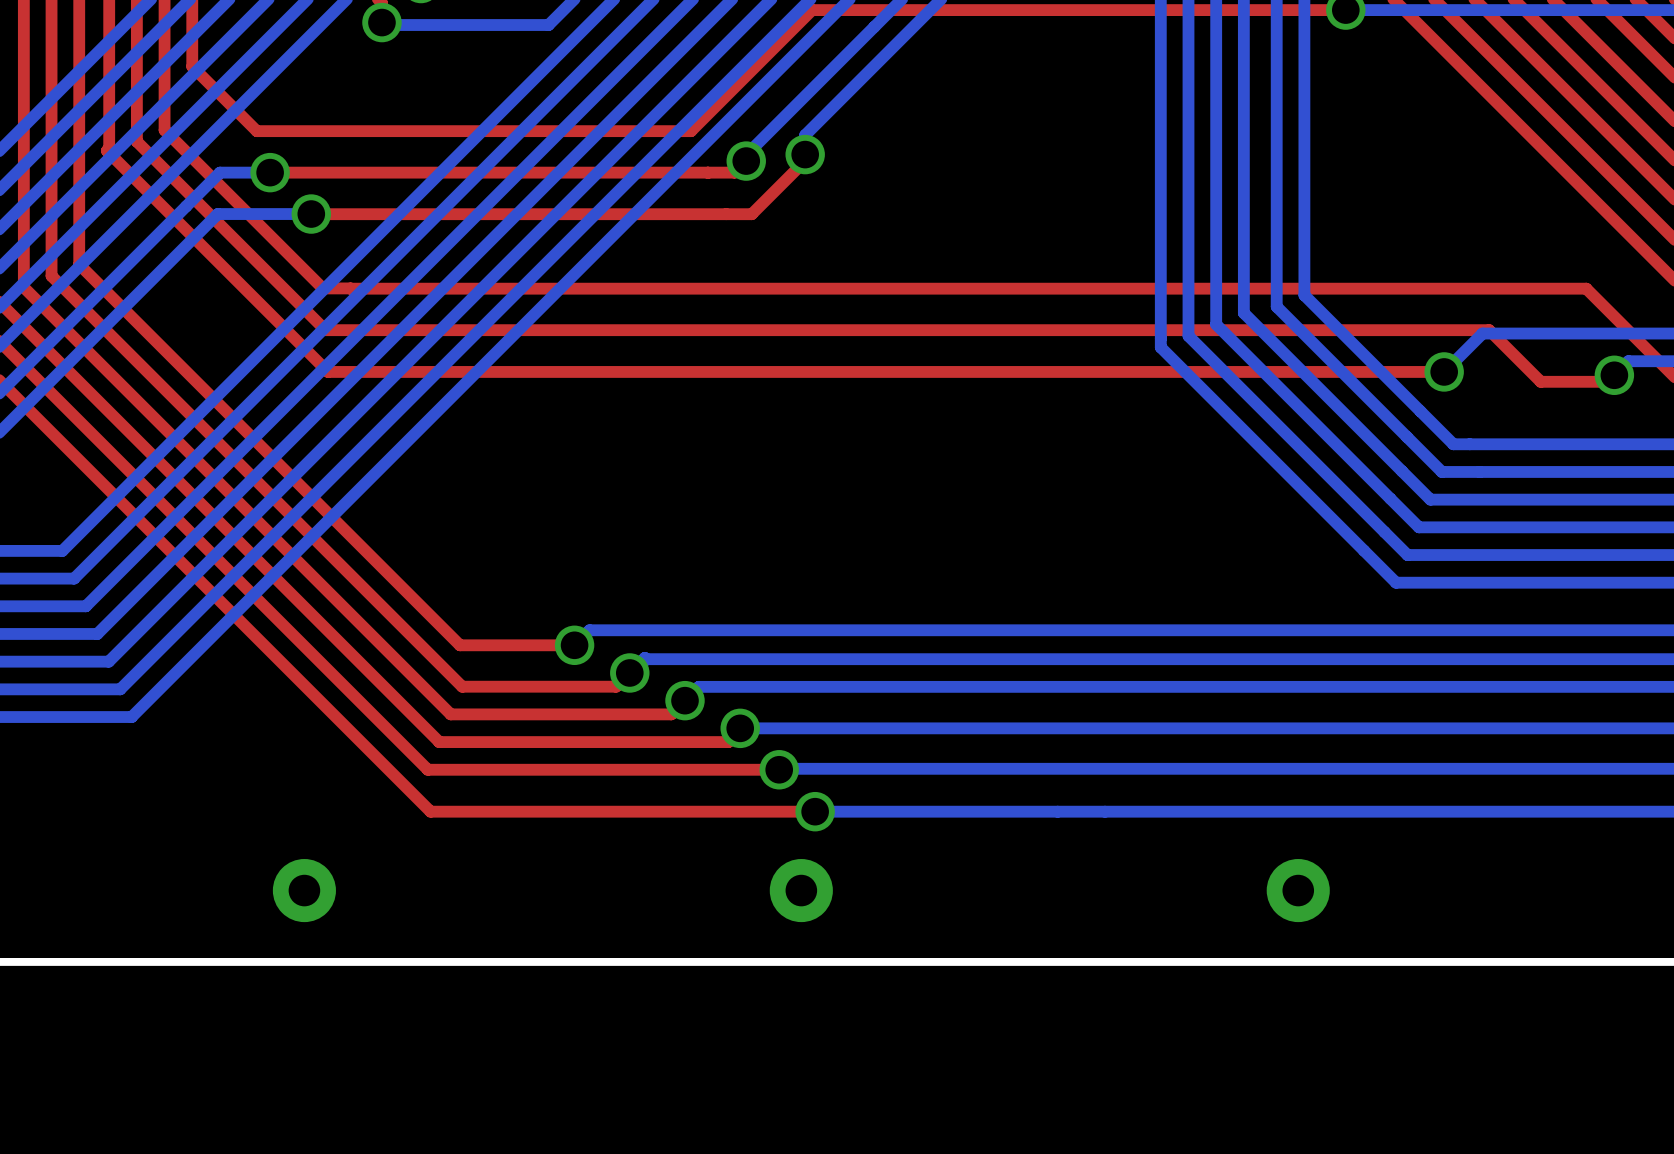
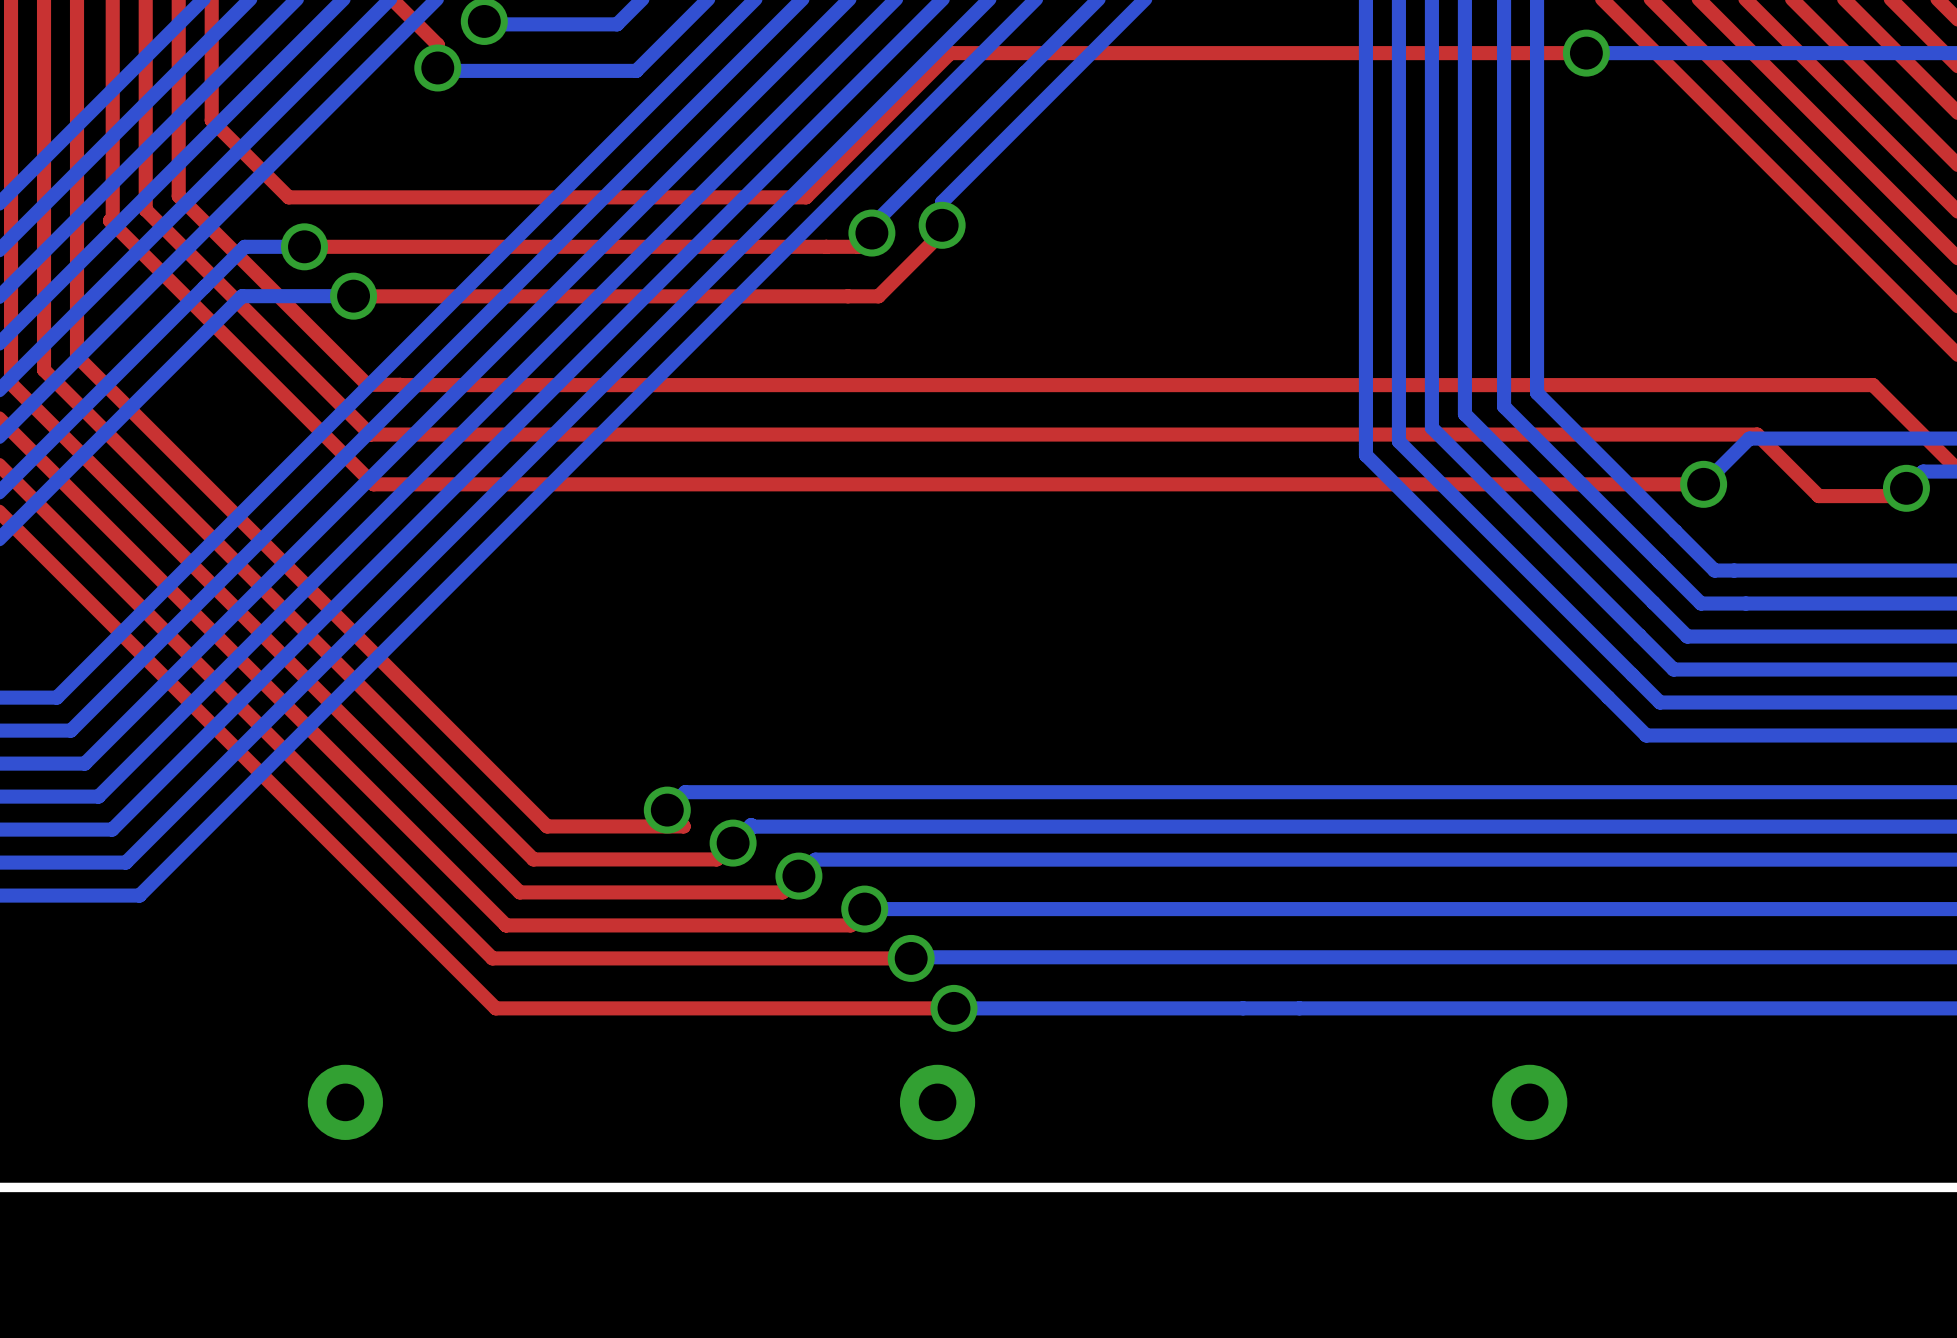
top track: (574, 645) (460, 645) -> (667, 810) (683, 826) (547, 826) (530, 810)

